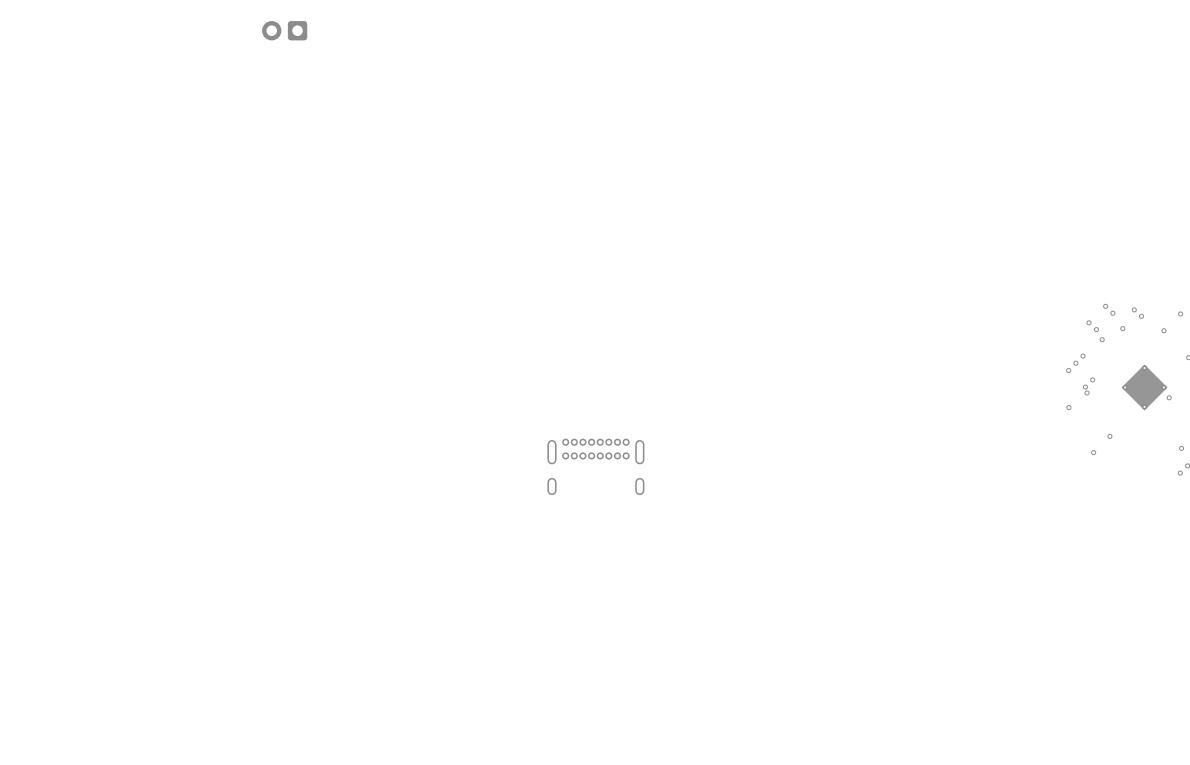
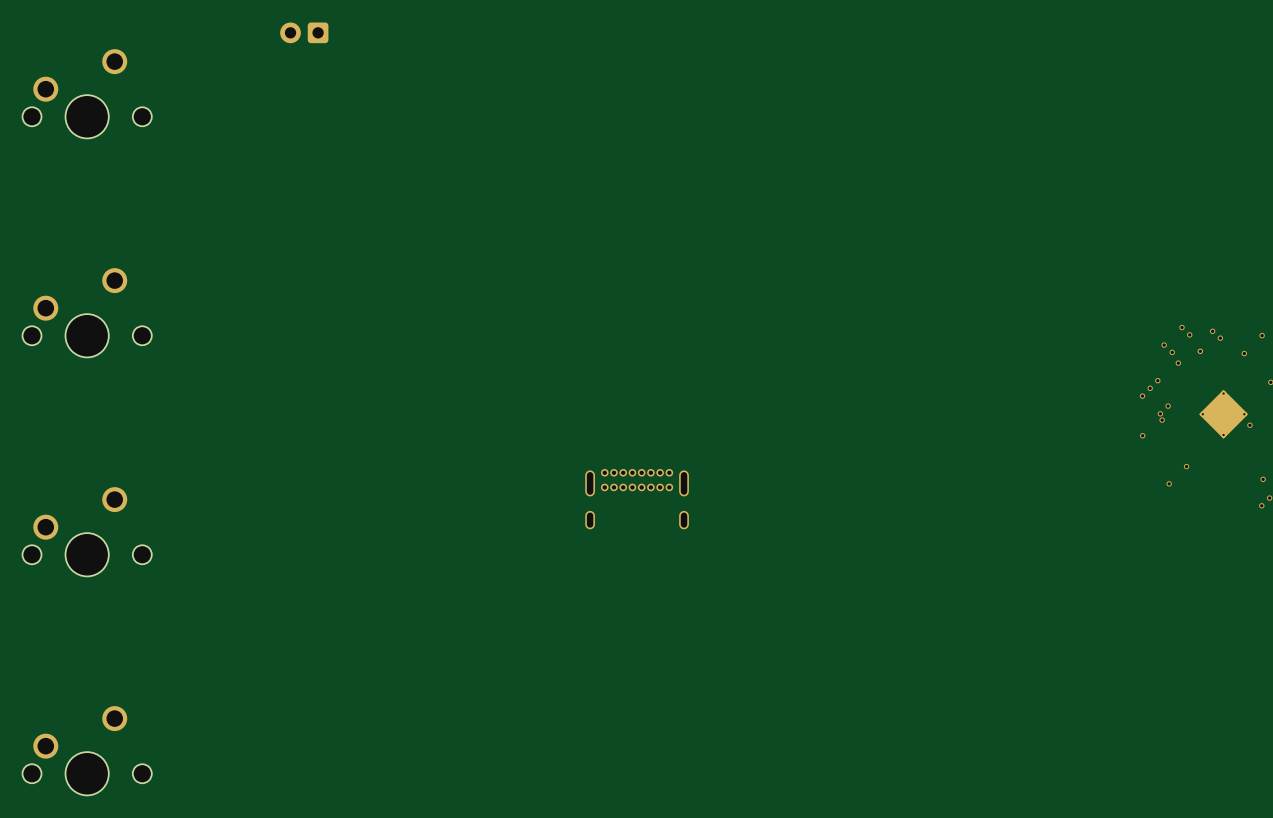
part: none -> (87, 93)
part: none -> (87, 312)
part: none -> (87, 531)
part: none -> (87, 750)

